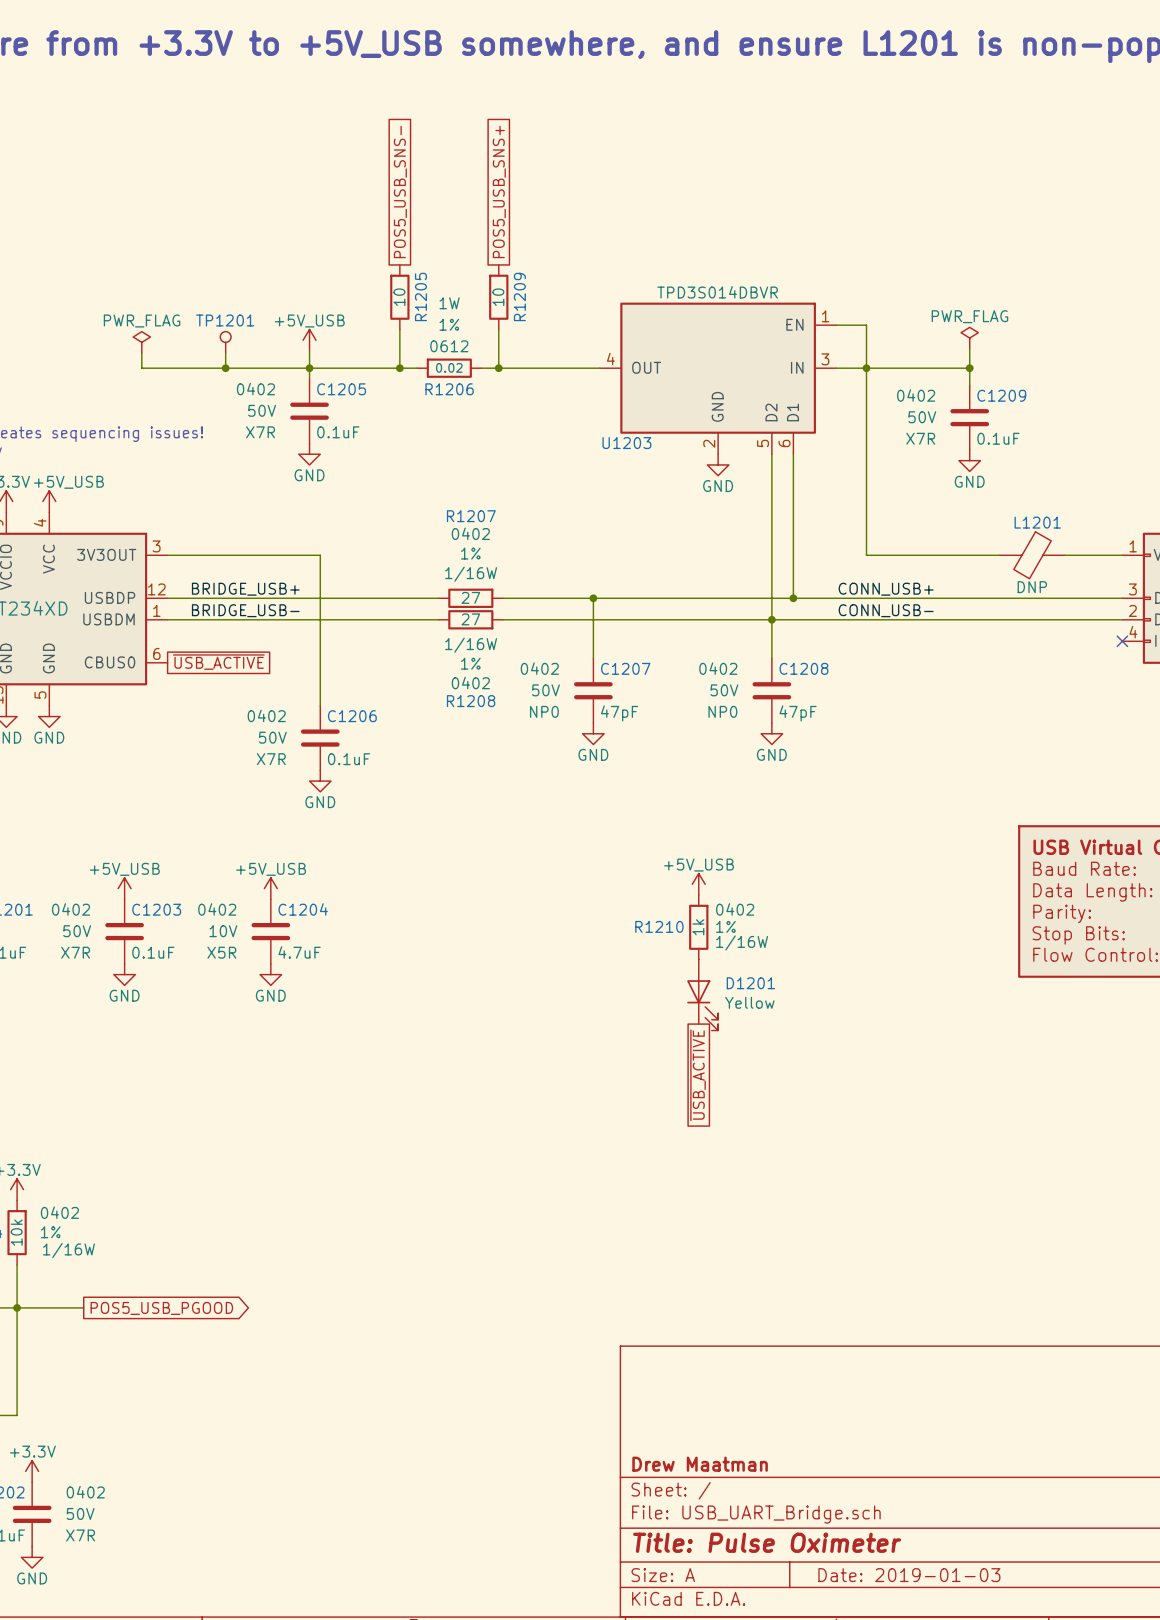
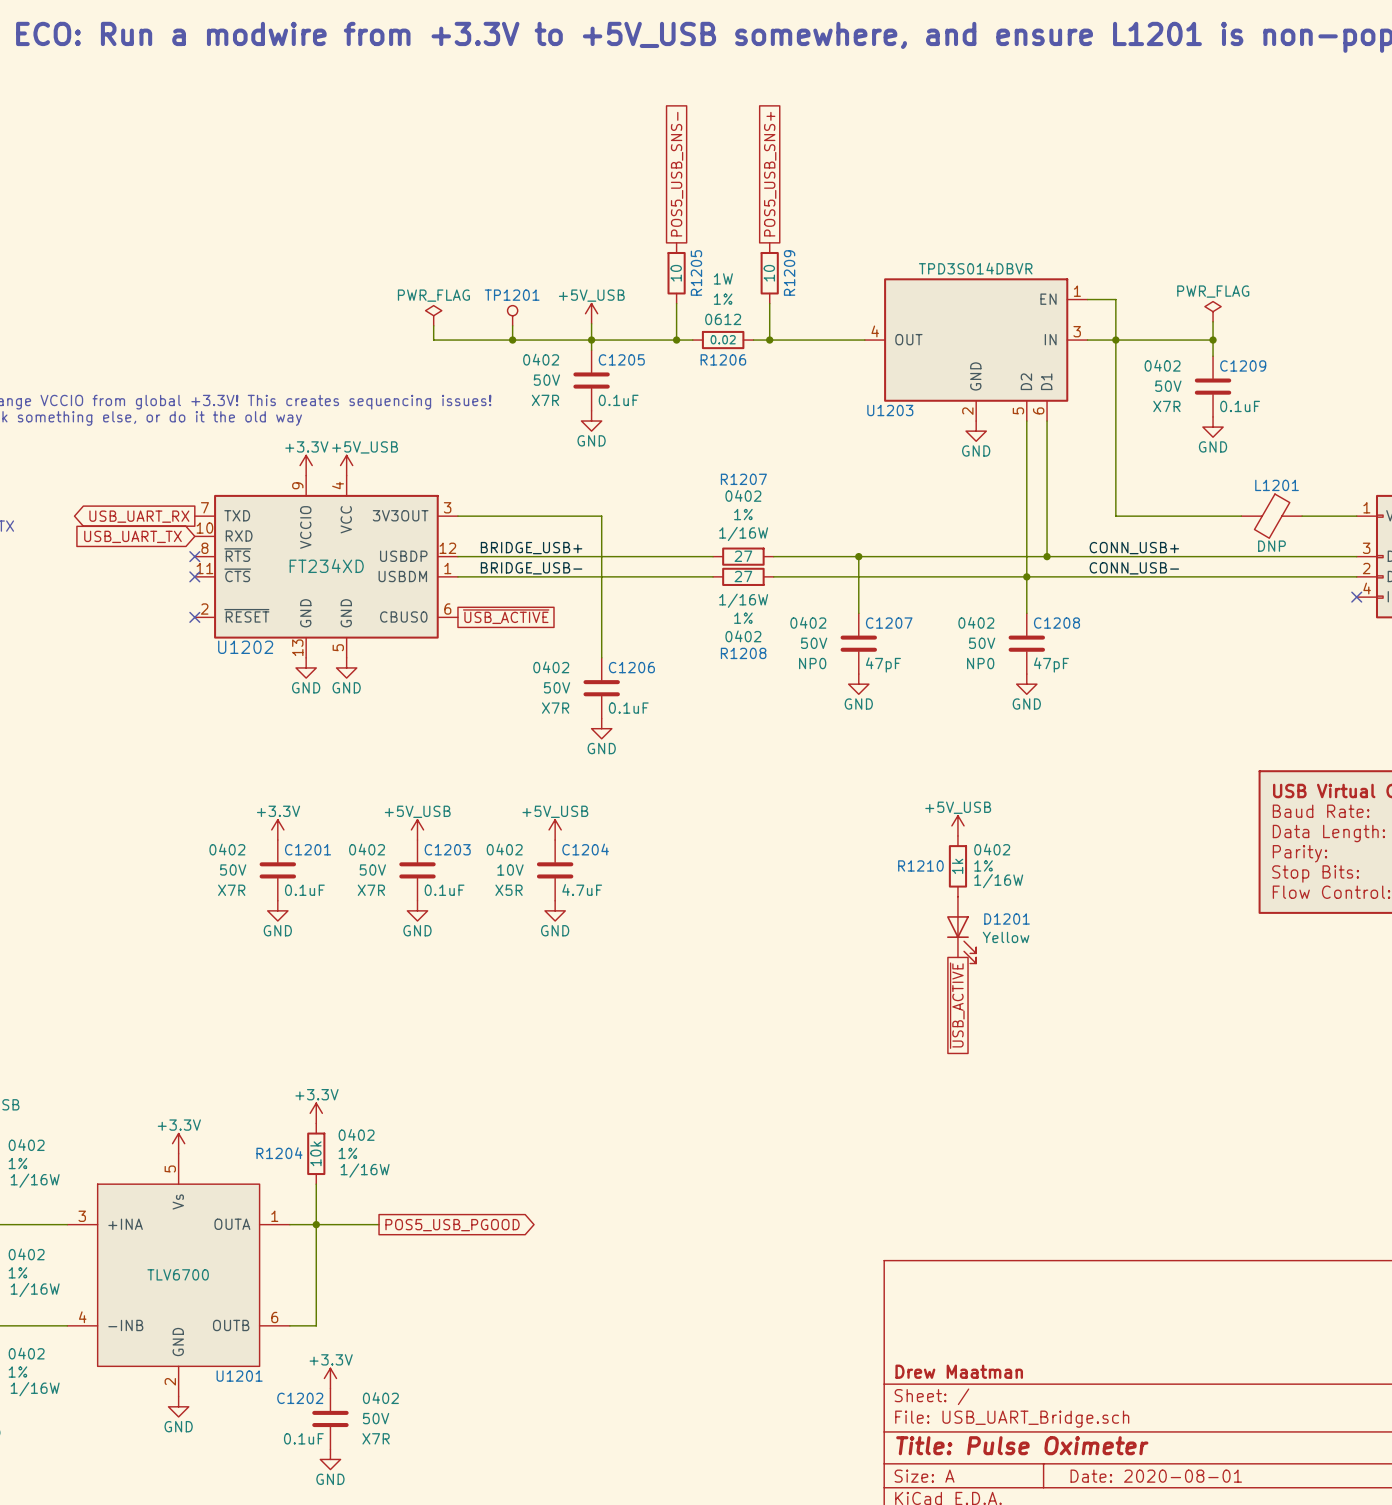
title block: Date: 2019-01-03 (909, 1575) -> Date: 2020-08-01 (1156, 1476)

